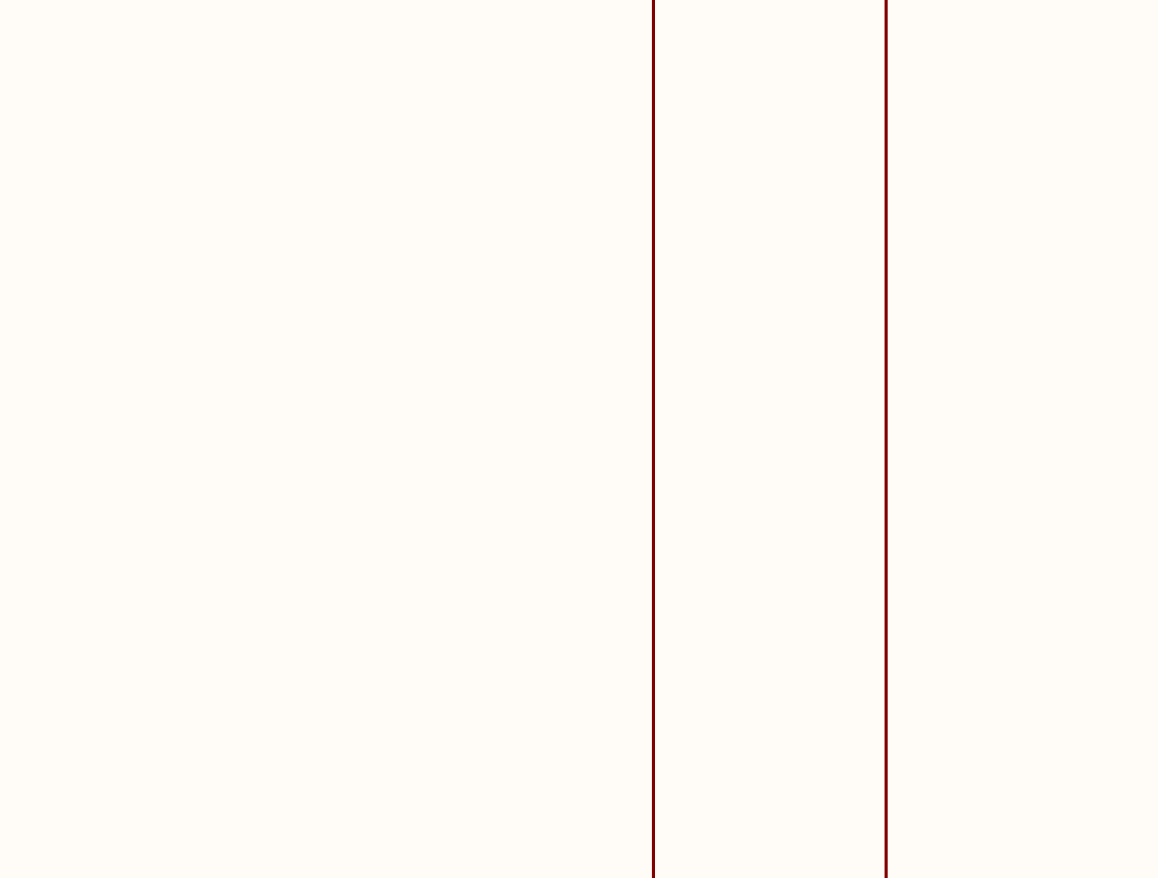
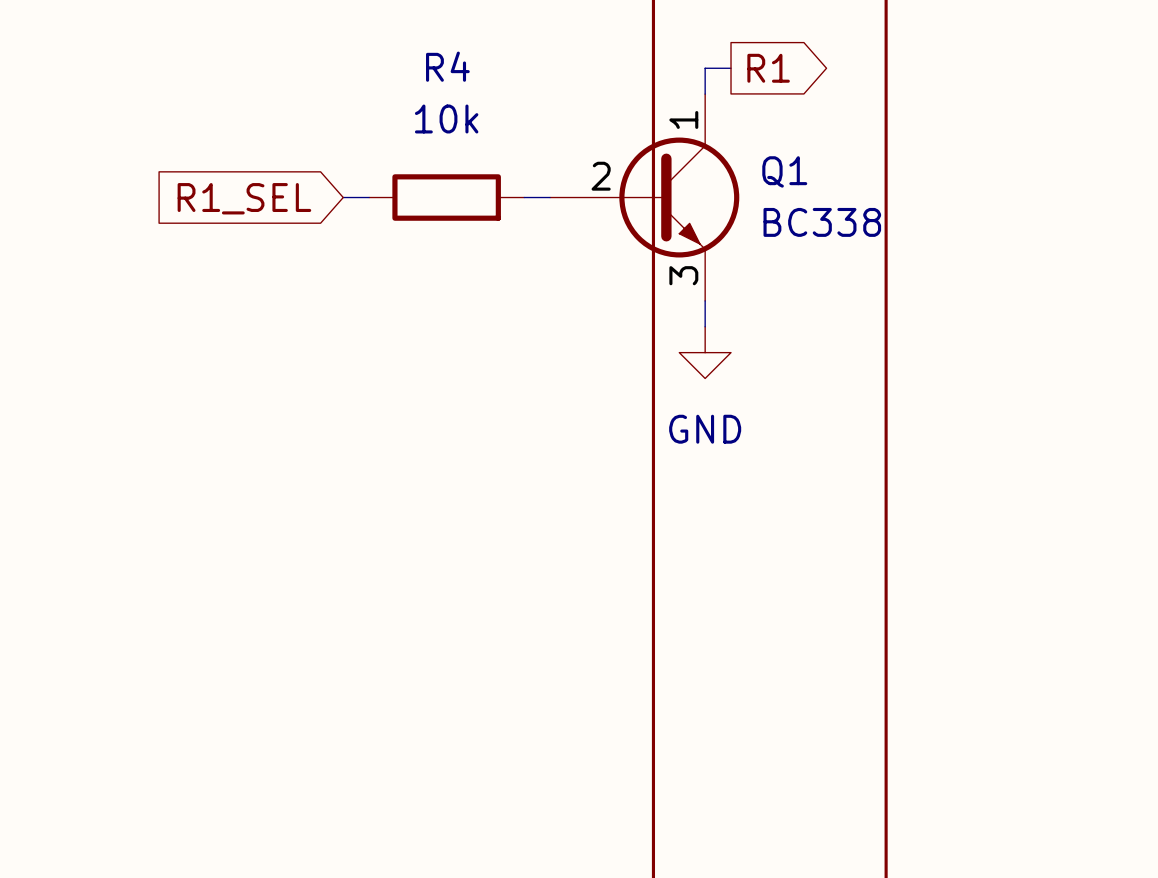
wire: none -> (731, 68) (705, 68) (705, 94)
global label: none -> R1 (768, 68)
wire: none -> (343, 197) (369, 197)
R4: none -> 10k (446, 197)
wire: none -> (524, 197) (550, 197)
Q1: none -> BC338 (644, 197)
global label: none -> R1_SEL (244, 198)
wire: none -> (705, 300) (705, 326)
power symbol: none -> GND (705, 352)

